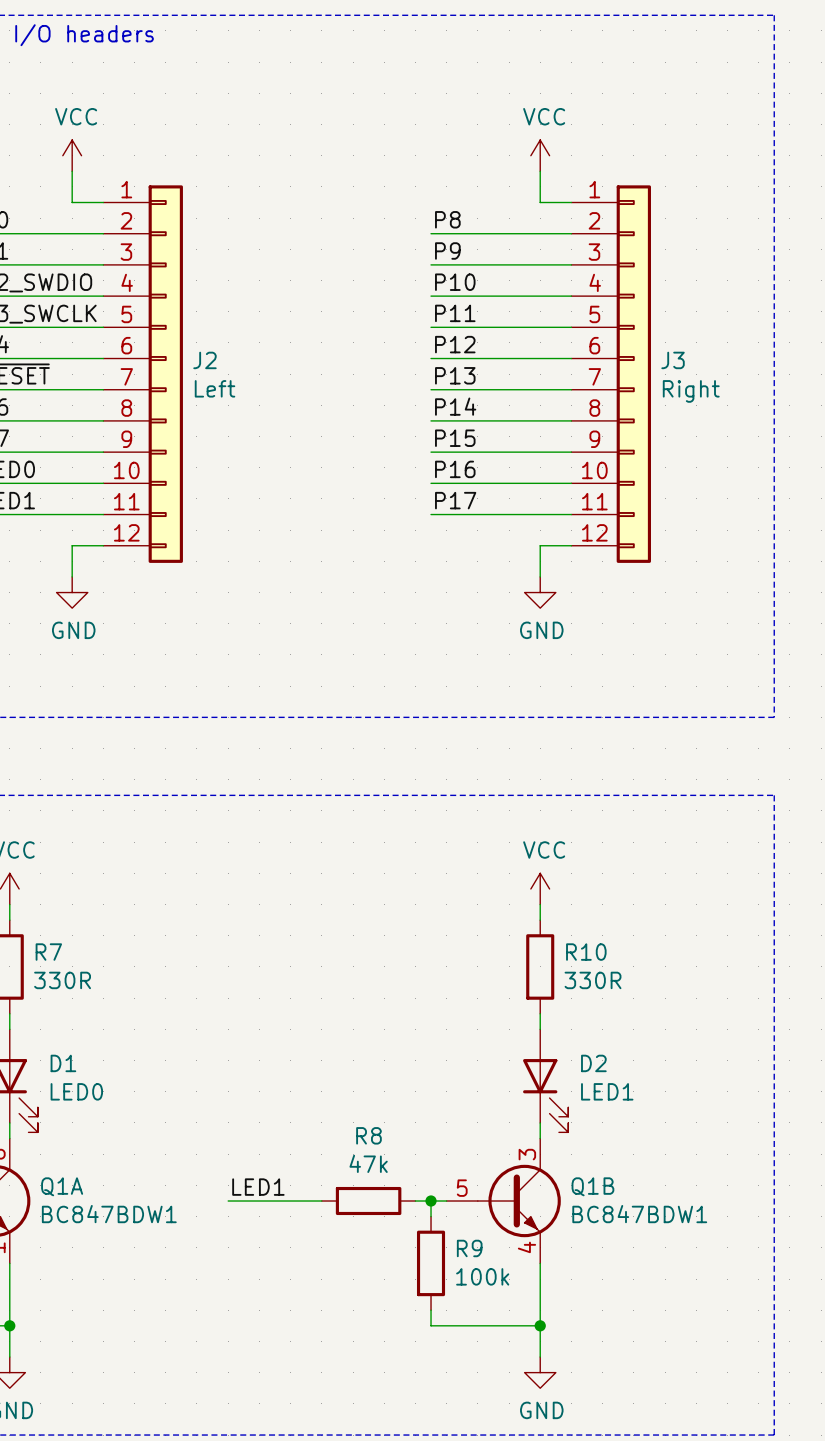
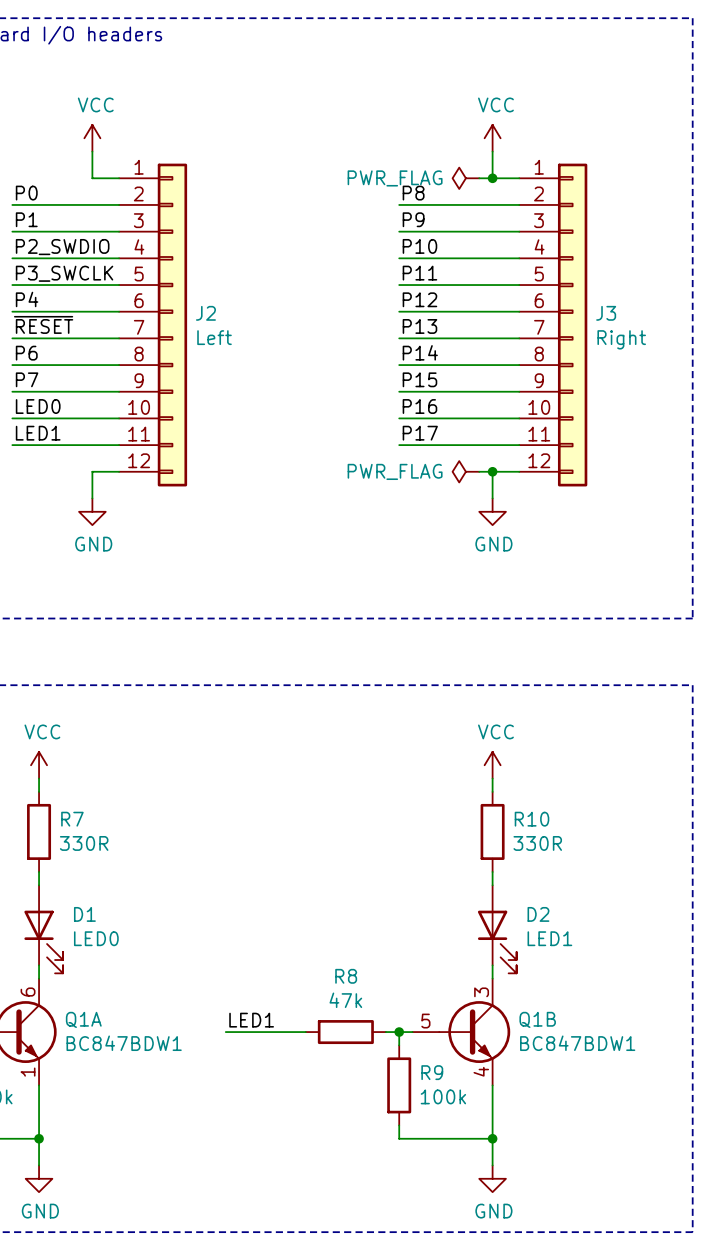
power symbol: none -> PWR_FLAG (465, 178)
wire: none -> (479, 178) (492, 178)
junction: none -> (492, 178)
power symbol: none -> PWR_FLAG (465, 471)
wire: none -> (479, 471) (492, 471)
junction: none -> (492, 471)

